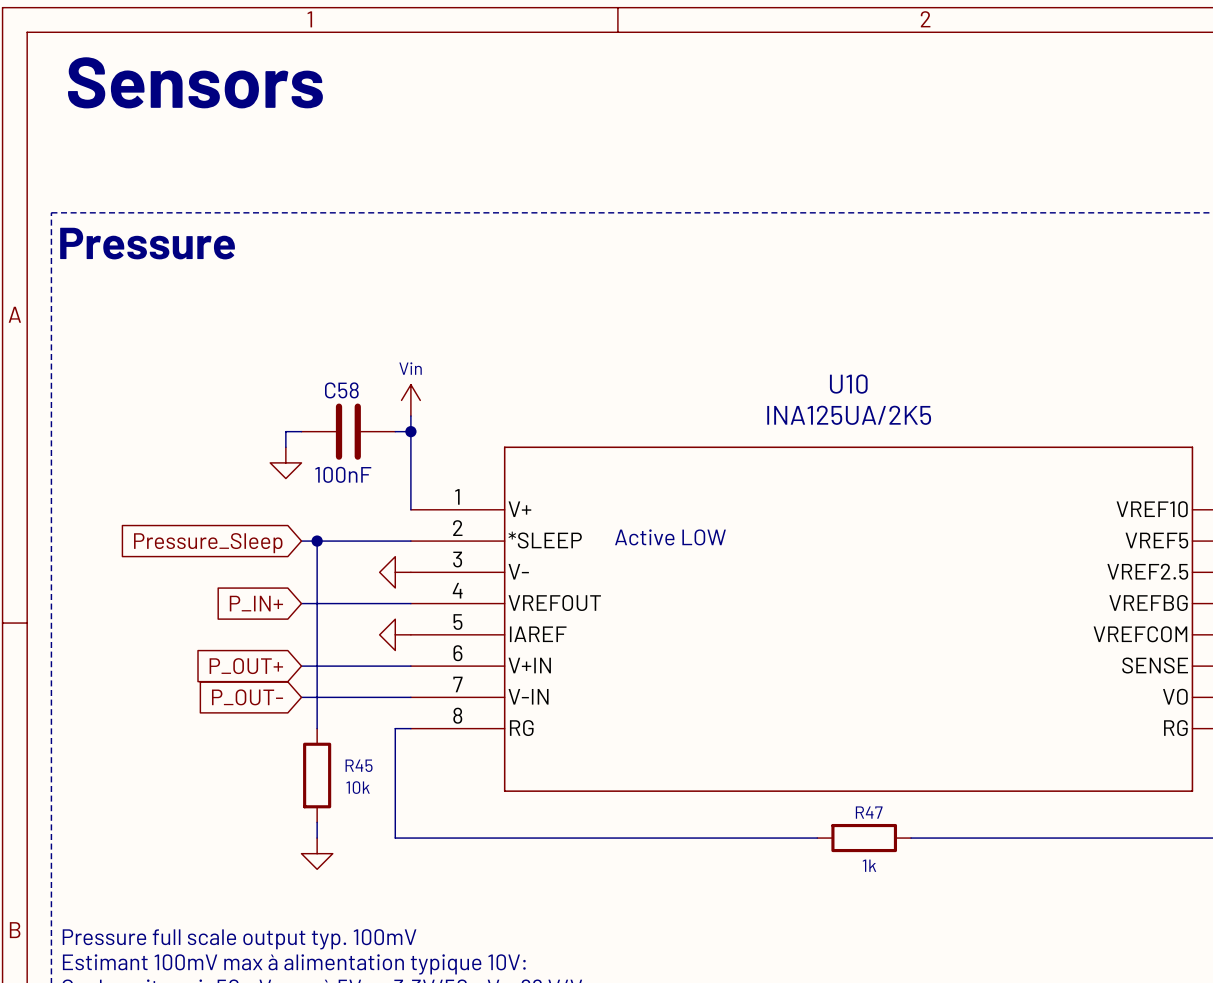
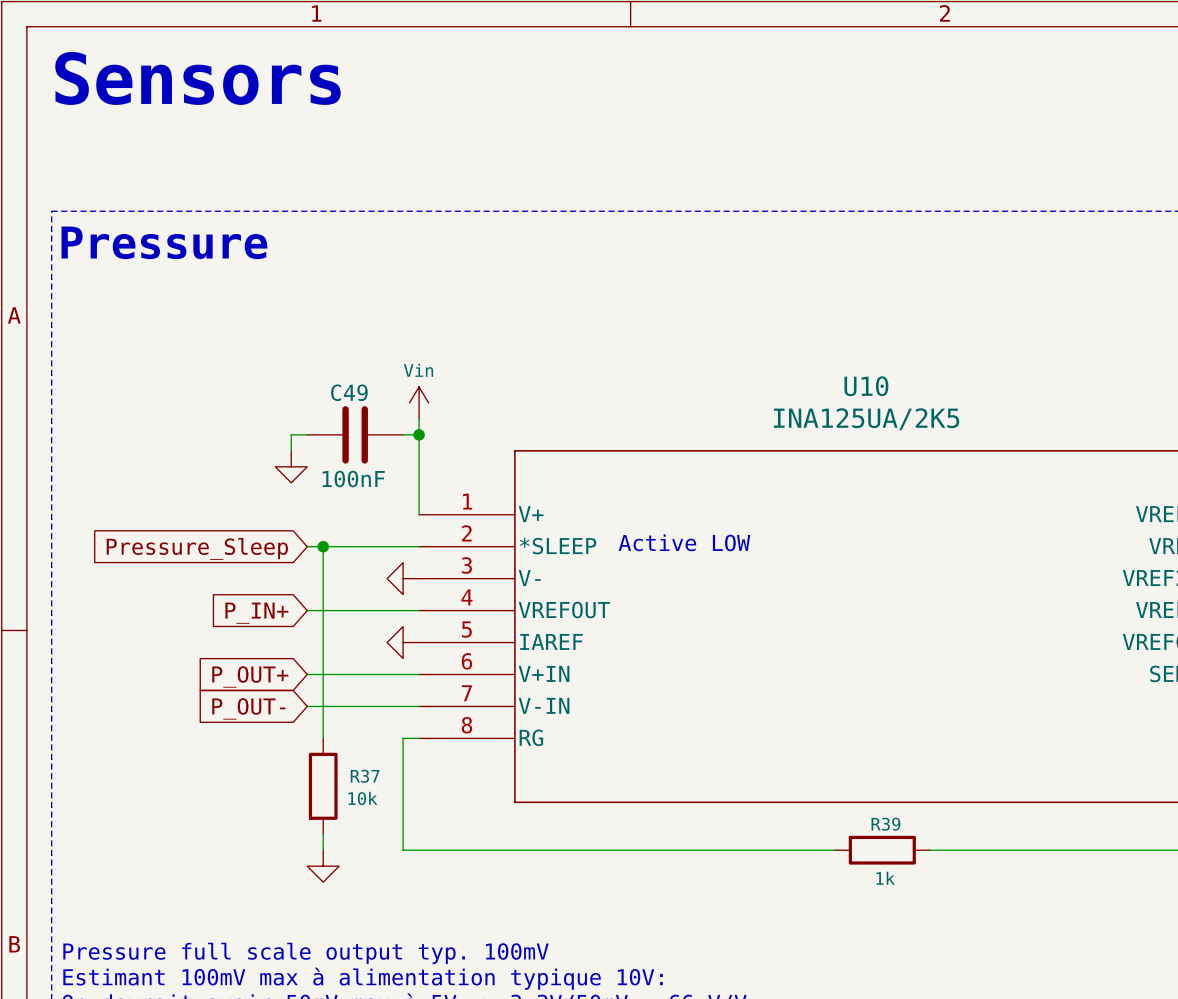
C58 name: C58 (341, 390) -> C49 (349, 392)
R45 name: R45 (359, 765) -> R37 (365, 776)
R47 name: R47 (869, 812) -> R39 (885, 824)

